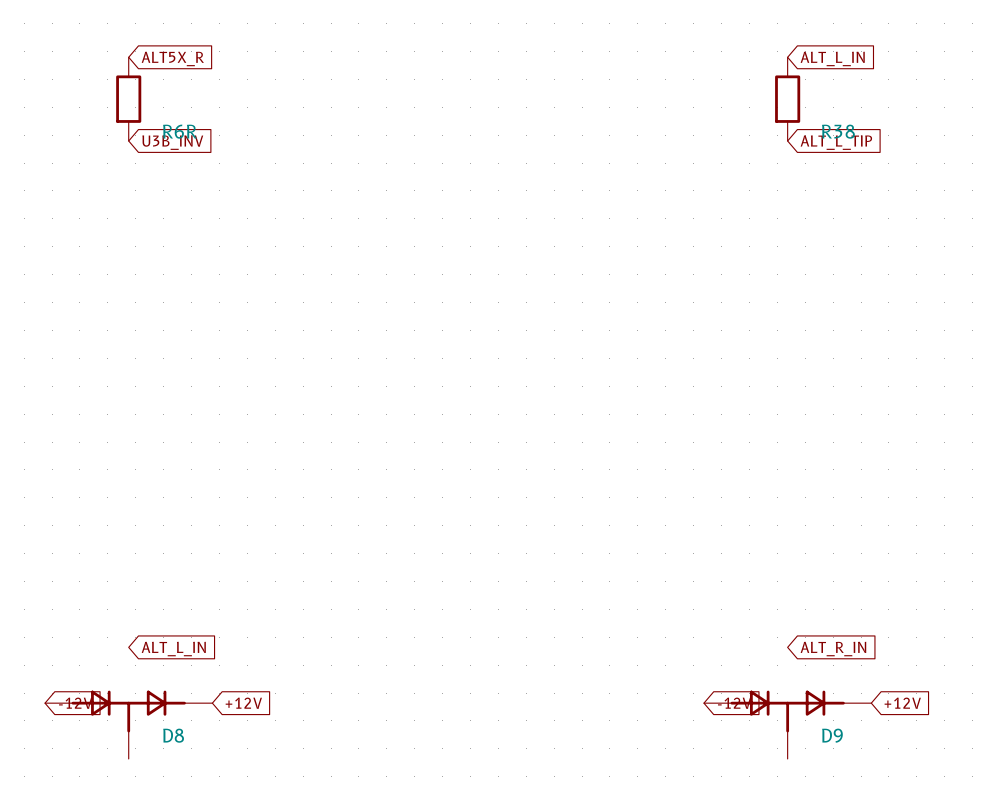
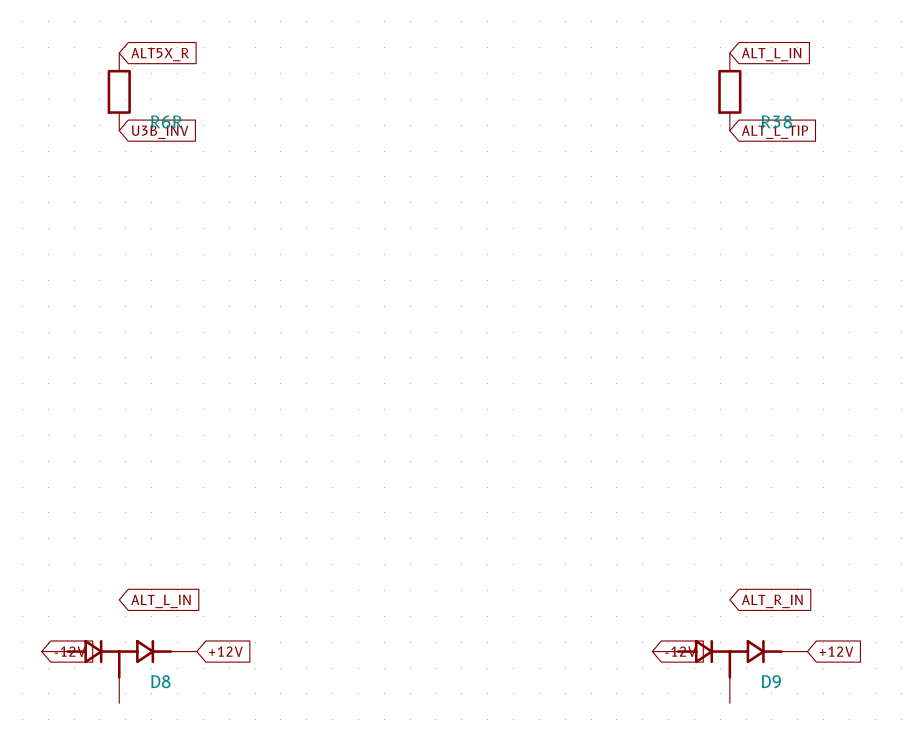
D8 symbol: [45, 690, 213, 759] -> [41, 639, 197, 704]
D9 symbol: [703, 690, 872, 759] -> [652, 639, 808, 704]

